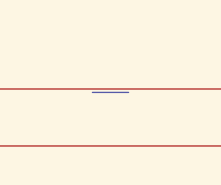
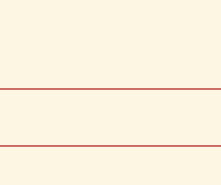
bus: (92, 92) (128, 92) -> none

